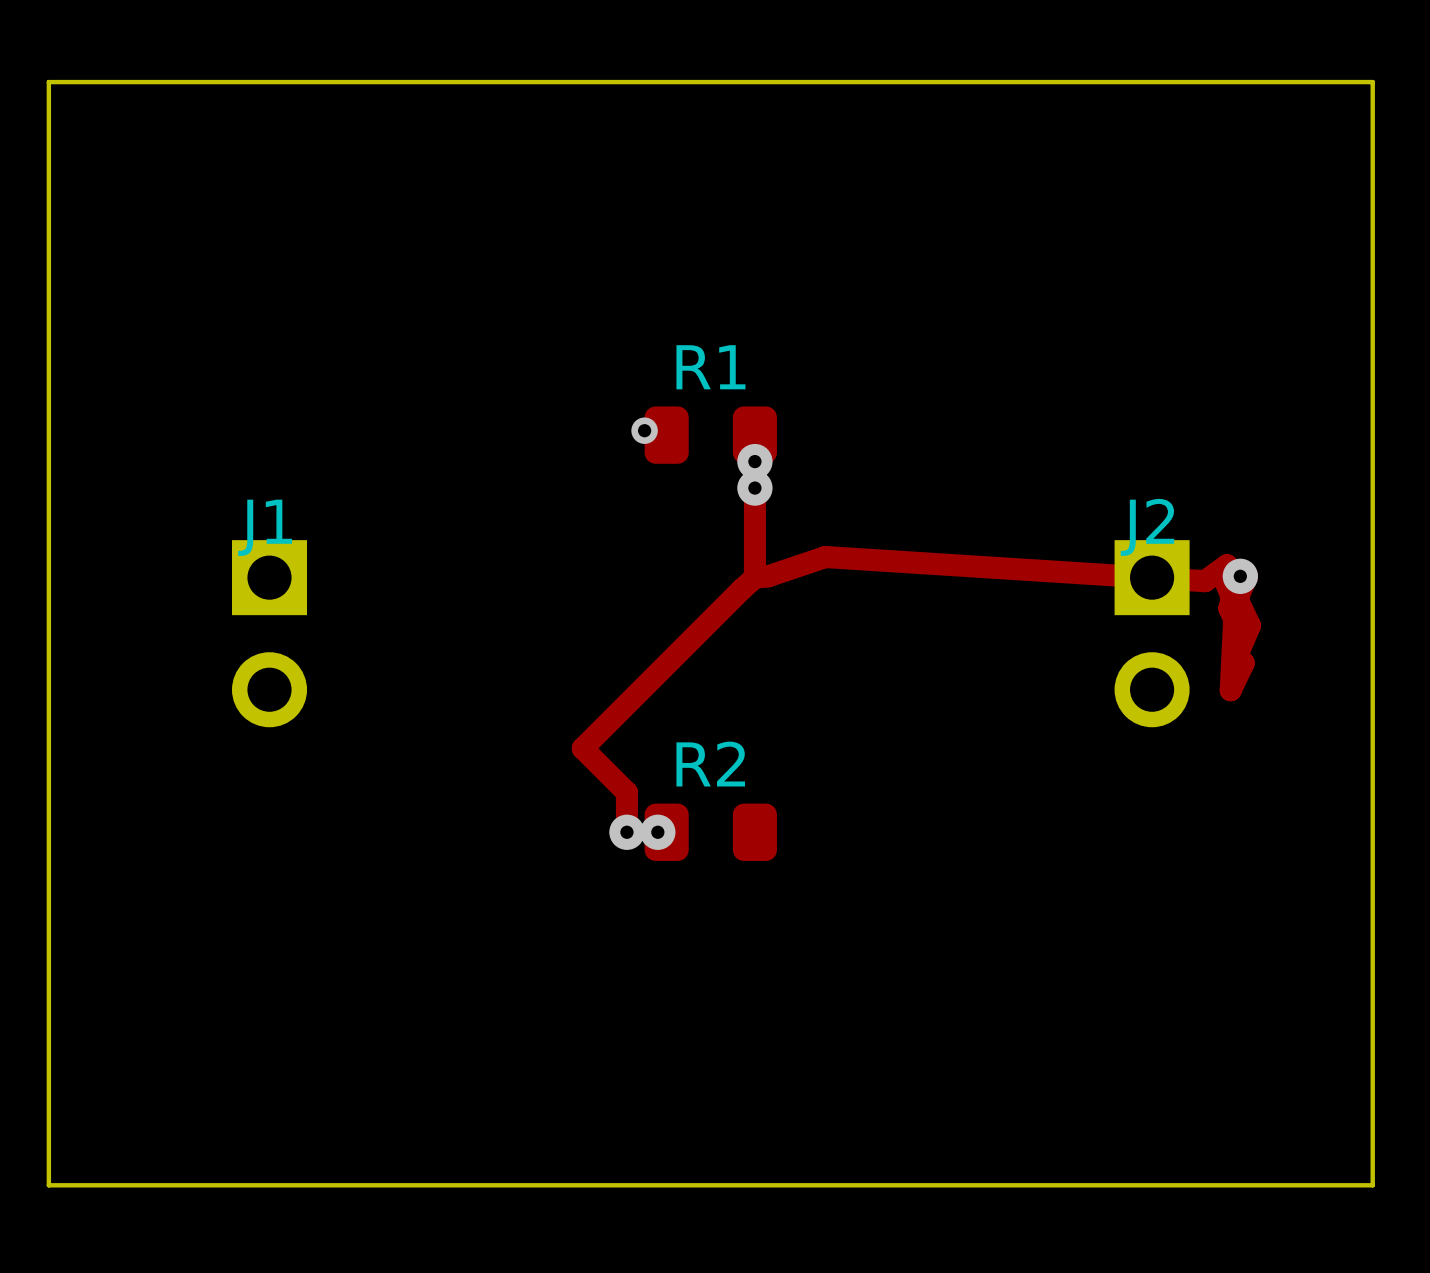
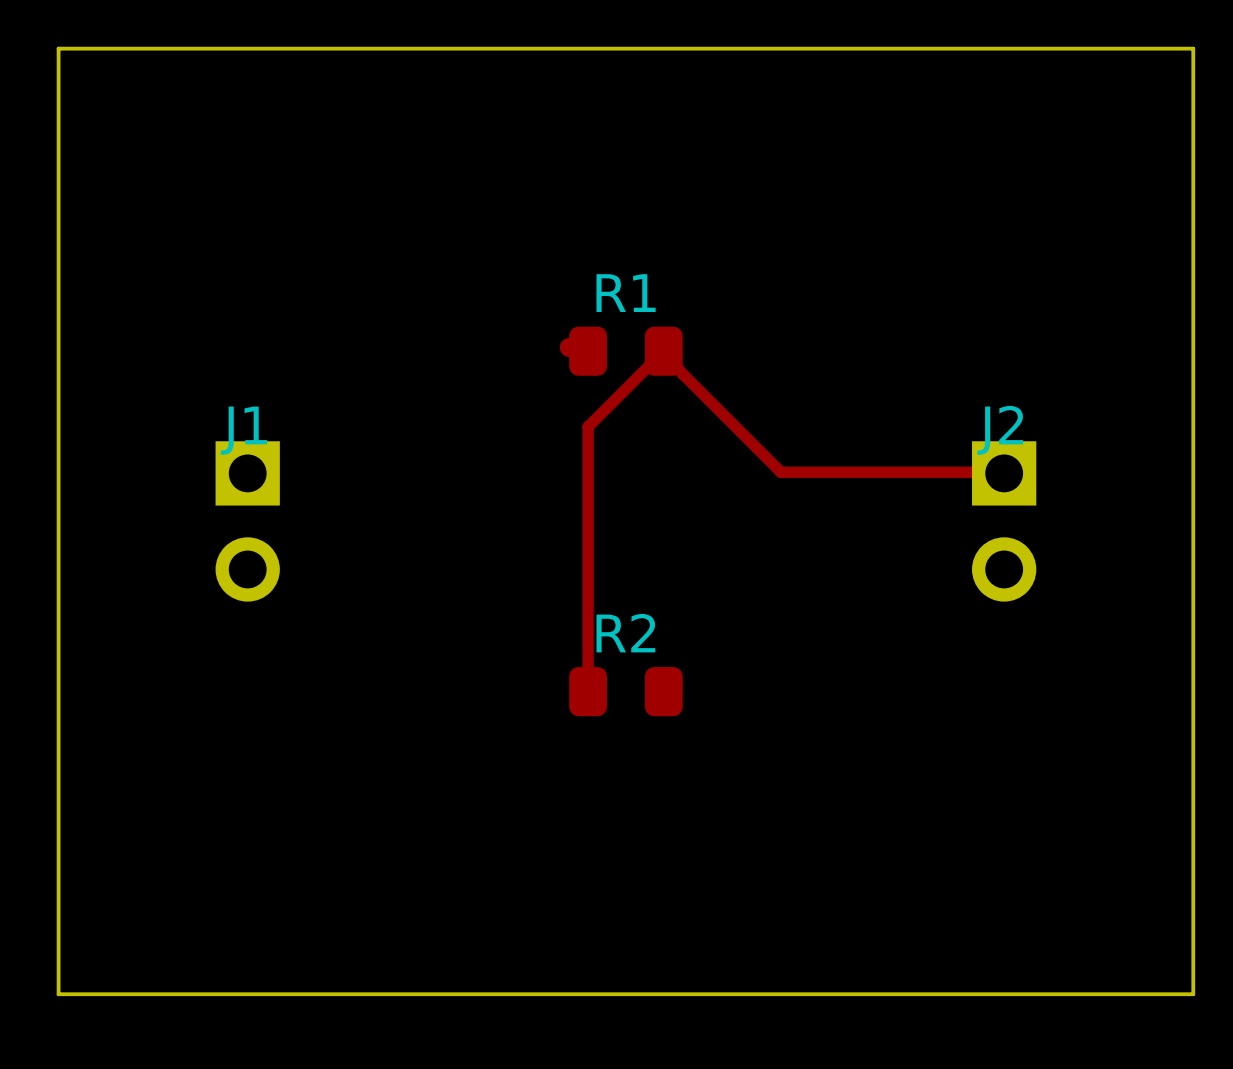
via: (644, 430) -> none
via: (754, 461) -> none
track: (754, 488) (754, 577) -> none
via: (754, 488) -> none
track: (1240, 576) (1246, 576) (1237, 598) (1249, 625) (1237, 655) (1243, 663) (1230, 690) (1234, 619) (1229, 608) (1232, 597) (1223, 577) (1226, 565) (1204, 581) (825, 557) (768, 576) (754, 577) -> none
via: (1240, 576) -> none
track: (754, 577) (582, 748) (626, 792) (626, 832) -> none
track: none -> (1004, 473) (781, 472) (682, 373) (663, 351) (588, 426) (588, 691)
via: (626, 832) -> none
via: (657, 832) -> none

